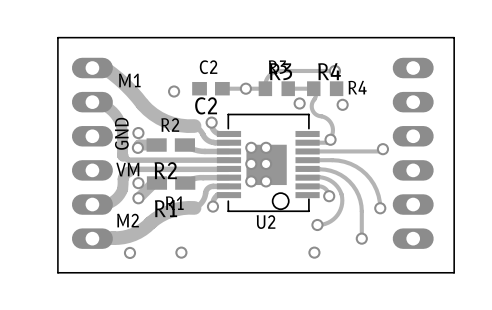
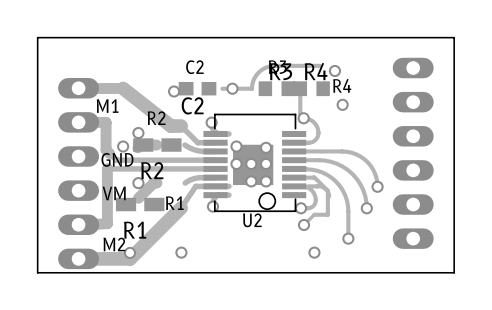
board edge: (57, 37) (57, 272) -> (57, 37) (37, 37) (37, 272) (57, 272)
text position: C2 (208, 67) -> C2 (194, 67)
track: (92, 68) (105, 68) (112, 73) (147, 109) (159, 118) (172, 123) (194, 126) (207, 139) (215, 142) -> (78, 88) (123, 88) (170, 126) (181, 126) (197, 142) (215, 142)
track: (334, 70) (277, 70) (268, 77) (265, 88) (251, 88) -> (319, 65) (268, 66) (256, 74) (251, 88)
text position: M1 (129, 80) -> M1 (107, 106)
text position: R4 (357, 87) -> R4 (342, 85)
C2 position: (210, 88) -> (197, 88)
via position: (245, 88) -> (232, 88)
track: (300, 88) (313, 88) (315, 94) (312, 103) (312, 110) (316, 114) (327, 119) (332, 128) (329, 142) (308, 142) -> (300, 88) (300, 120) (303, 118) (311, 120) (318, 131) (316, 138) (308, 142)
R4 position: (325, 88) -> (311, 88)
track: (92, 102) (106, 106) (117, 118) (122, 129) (122, 155) (128, 160) -> (78, 122) (105, 122) (106, 149) (116, 160) (128, 160)
via position: (299, 103) -> (303, 118)
text position: R2 (170, 125) -> R2 (156, 118)
text rotation: 0° (121, 133) -> 90° clockwise (117, 159)
via: (330, 139) -> none
R2 position: (170, 145) -> (157, 145)
via: none -> (236, 146)
via position: (137, 147) -> (123, 146)
via: (251, 147) -> none
track: (382, 149) (381, 151) (342, 151) -> (377, 186) (374, 173) (367, 161) (355, 154) (342, 151)
via: (382, 149) -> none
part position: (92, 153) -> (78, 173)
track: (318, 160) (344, 161) (361, 170) (373, 184) (378, 195) (380, 208) -> (318, 160) (337, 163) (352, 174) (363, 189) (366, 208)
part position: (268, 162) -> (254, 162)
via: none -> (236, 163)
track: none -> (215, 168) (107, 168)
track: (228, 168) (132, 169) (123, 176) (122, 189) (115, 199) (104, 204) (92, 204) -> none
track: (307, 168) (335, 172) (353, 185) (361, 205) (361, 238) -> (294, 168) (322, 172) (339, 185) (348, 205) (348, 238)
track: none -> (107, 169) (107, 223) (85, 225)
text position: VM (127, 169) -> VM (114, 193)
track: (313, 177) (322, 177) (330, 180) (339, 188) (342, 197) (340, 209) (335, 217) (328, 222) (317, 225) -> (313, 177) (327, 190) (327, 214) (314, 214) (304, 225)
R1 position: (171, 183) -> (140, 204)
track: (213, 186) (207, 189) (203, 200) (197, 206) (165, 213) (133, 234) (118, 238) (92, 238) -> (213, 186) (195, 186) (181, 207) (130, 258) (78, 258)
track: none -> (294, 186) (307, 187) (314, 195) (315, 201) (313, 205) (300, 208)
via: none -> (377, 186)
via: (329, 196) -> none
via: (138, 198) -> none
via: none -> (300, 208)
via: none -> (366, 208)
via: (380, 208) -> none
text position: M2 (128, 220) -> M2 (114, 244)
text position: U2 (266, 222) -> U2 (252, 220)
via: none -> (304, 225)
via: (317, 225) -> none
via position: (361, 238) -> (348, 238)

